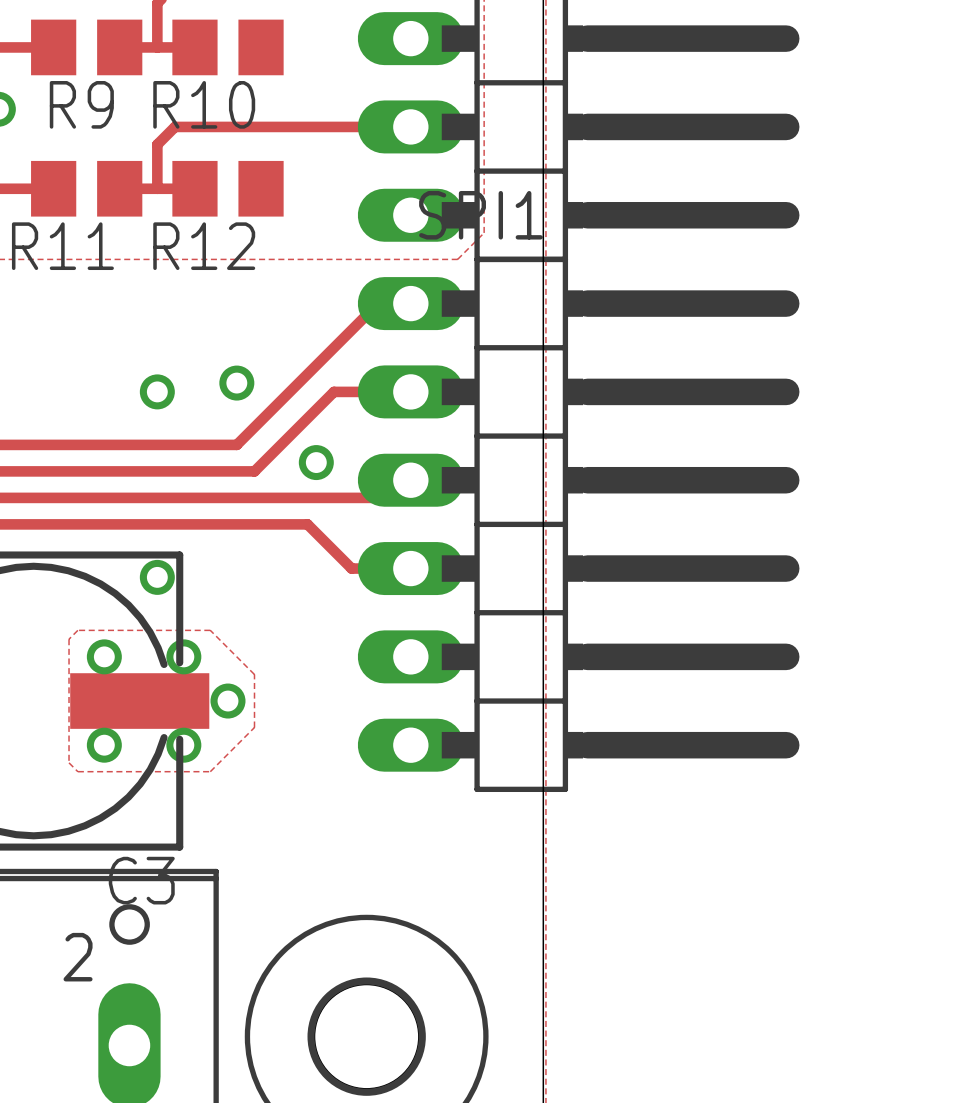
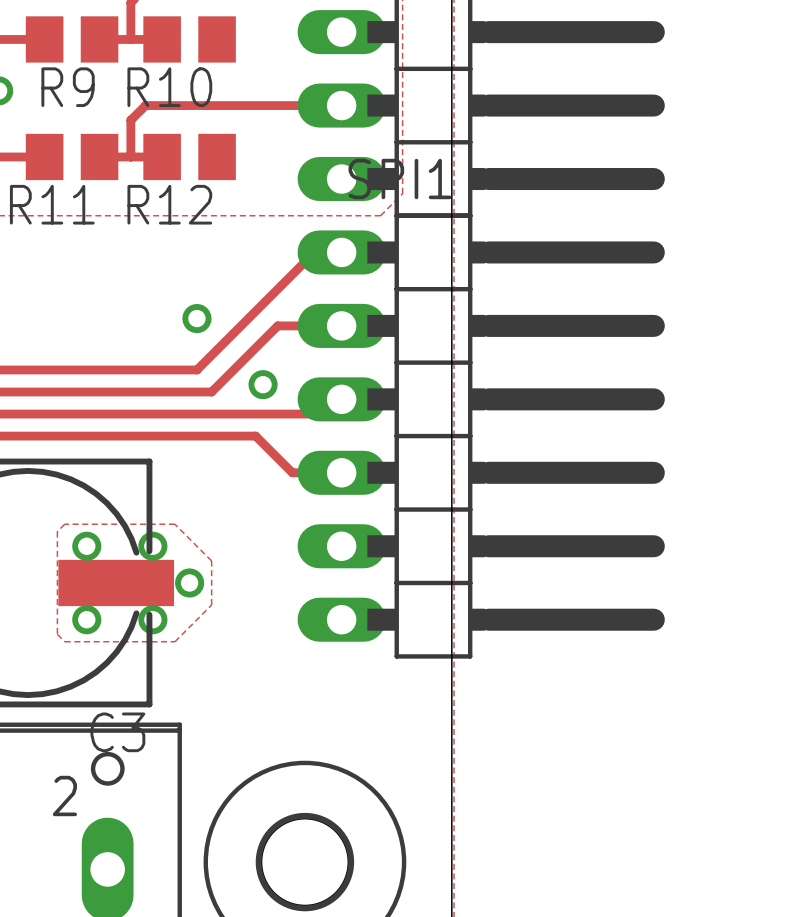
via: (157, 391) -> none
via: (157, 577) -> none

